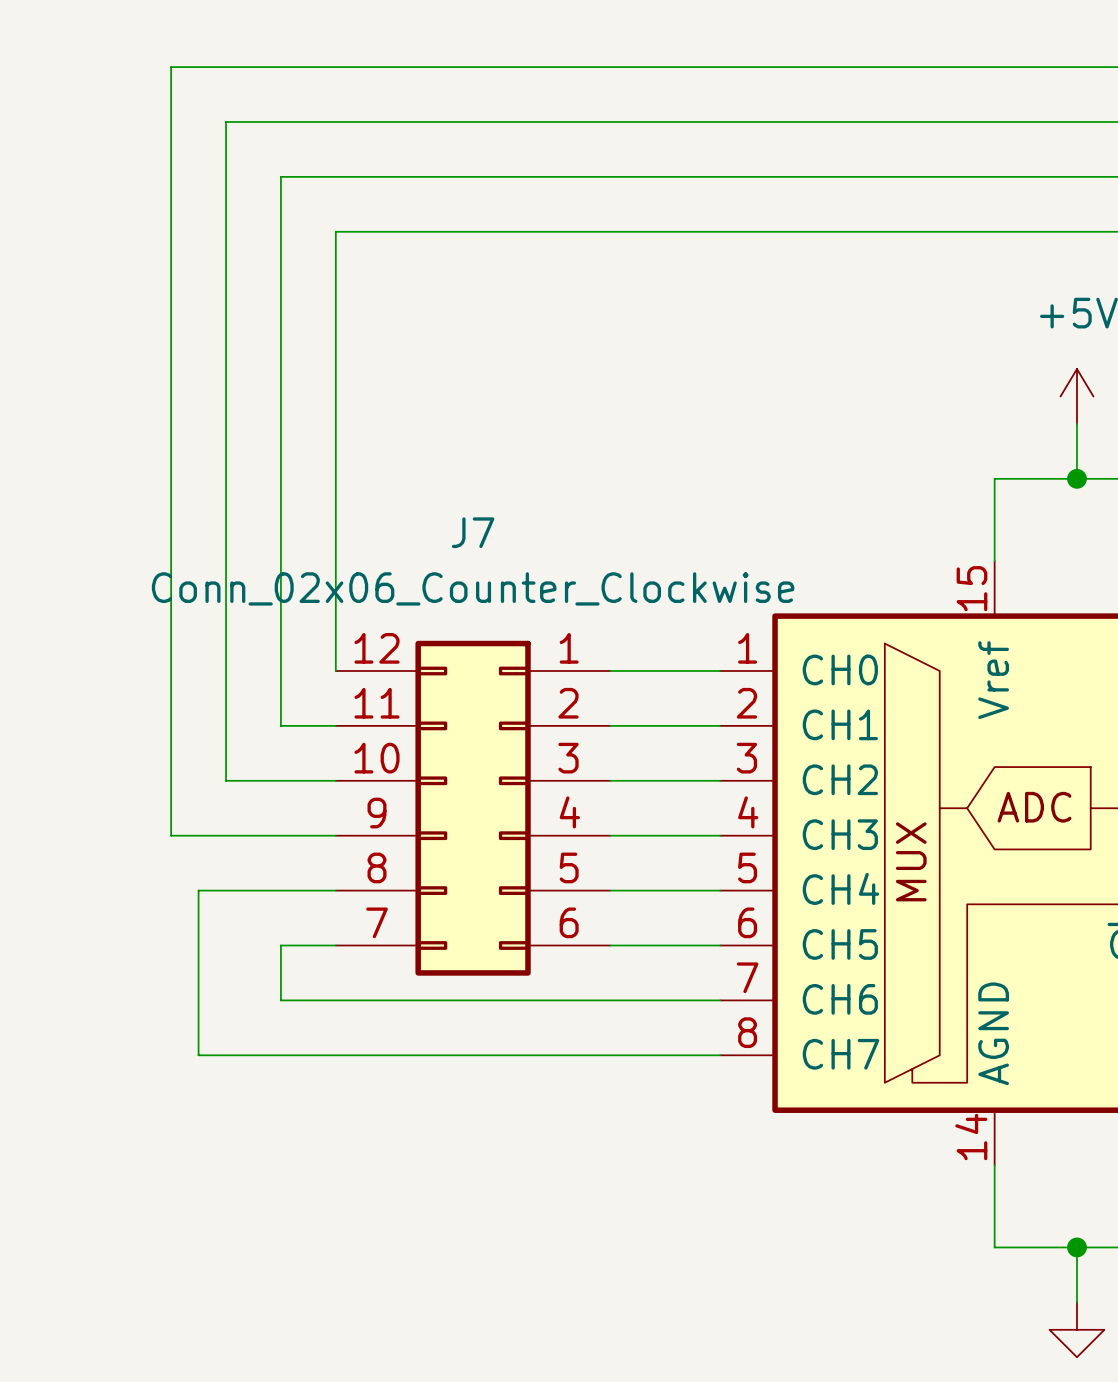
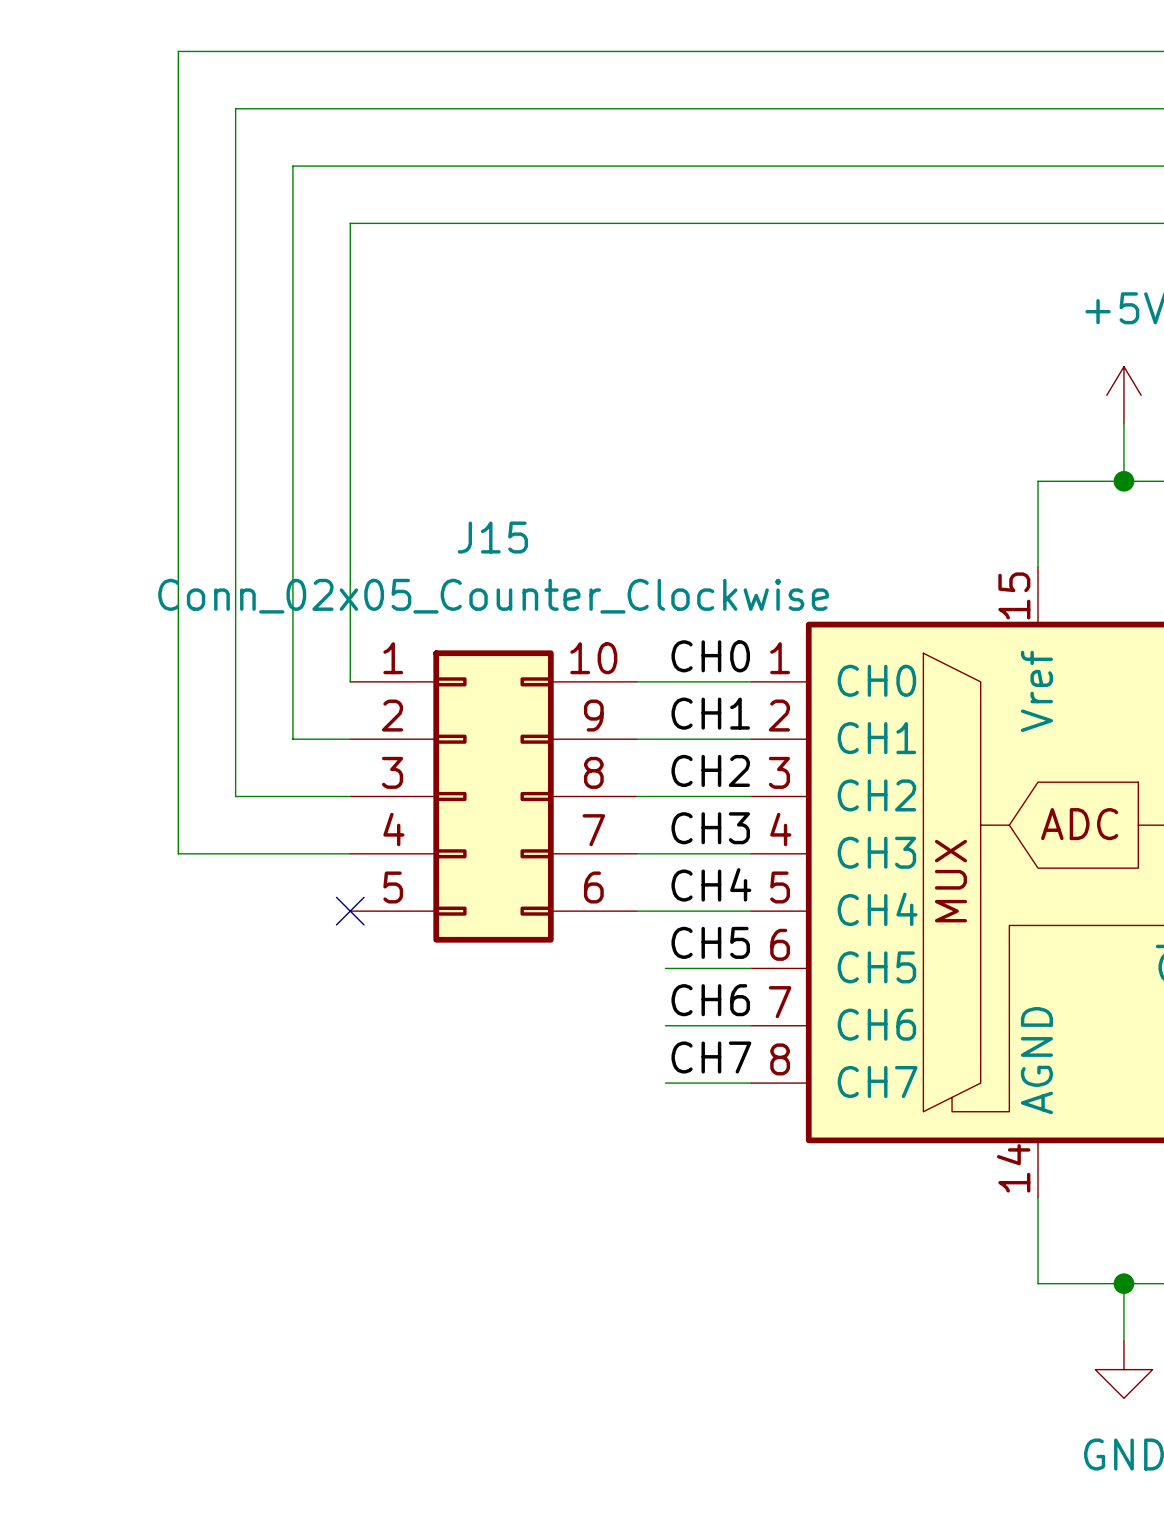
label: none -> CH0 (710, 656)
label: none -> CH1 (710, 713)
label: none -> CH2 (710, 770)
J15: none -> Conn_02x05_Counter_Clockwise (493, 796)
J7: Conn_02x06_Counter_Clockwise (473, 808) -> none
label: none -> CH3 (710, 828)
label: none -> CH4 (711, 884)
wire: (335, 890) (198, 890) (198, 1055) (637, 1055) -> none
no-connect mark: none -> (350, 911)
label: none -> CH5 (710, 942)
wire: (335, 945) (280, 945) (280, 1000) (637, 1000) -> none
wire: (610, 945) (637, 945) -> none
label: none -> CH6 (710, 1000)
label: none -> CH7 (711, 1057)

